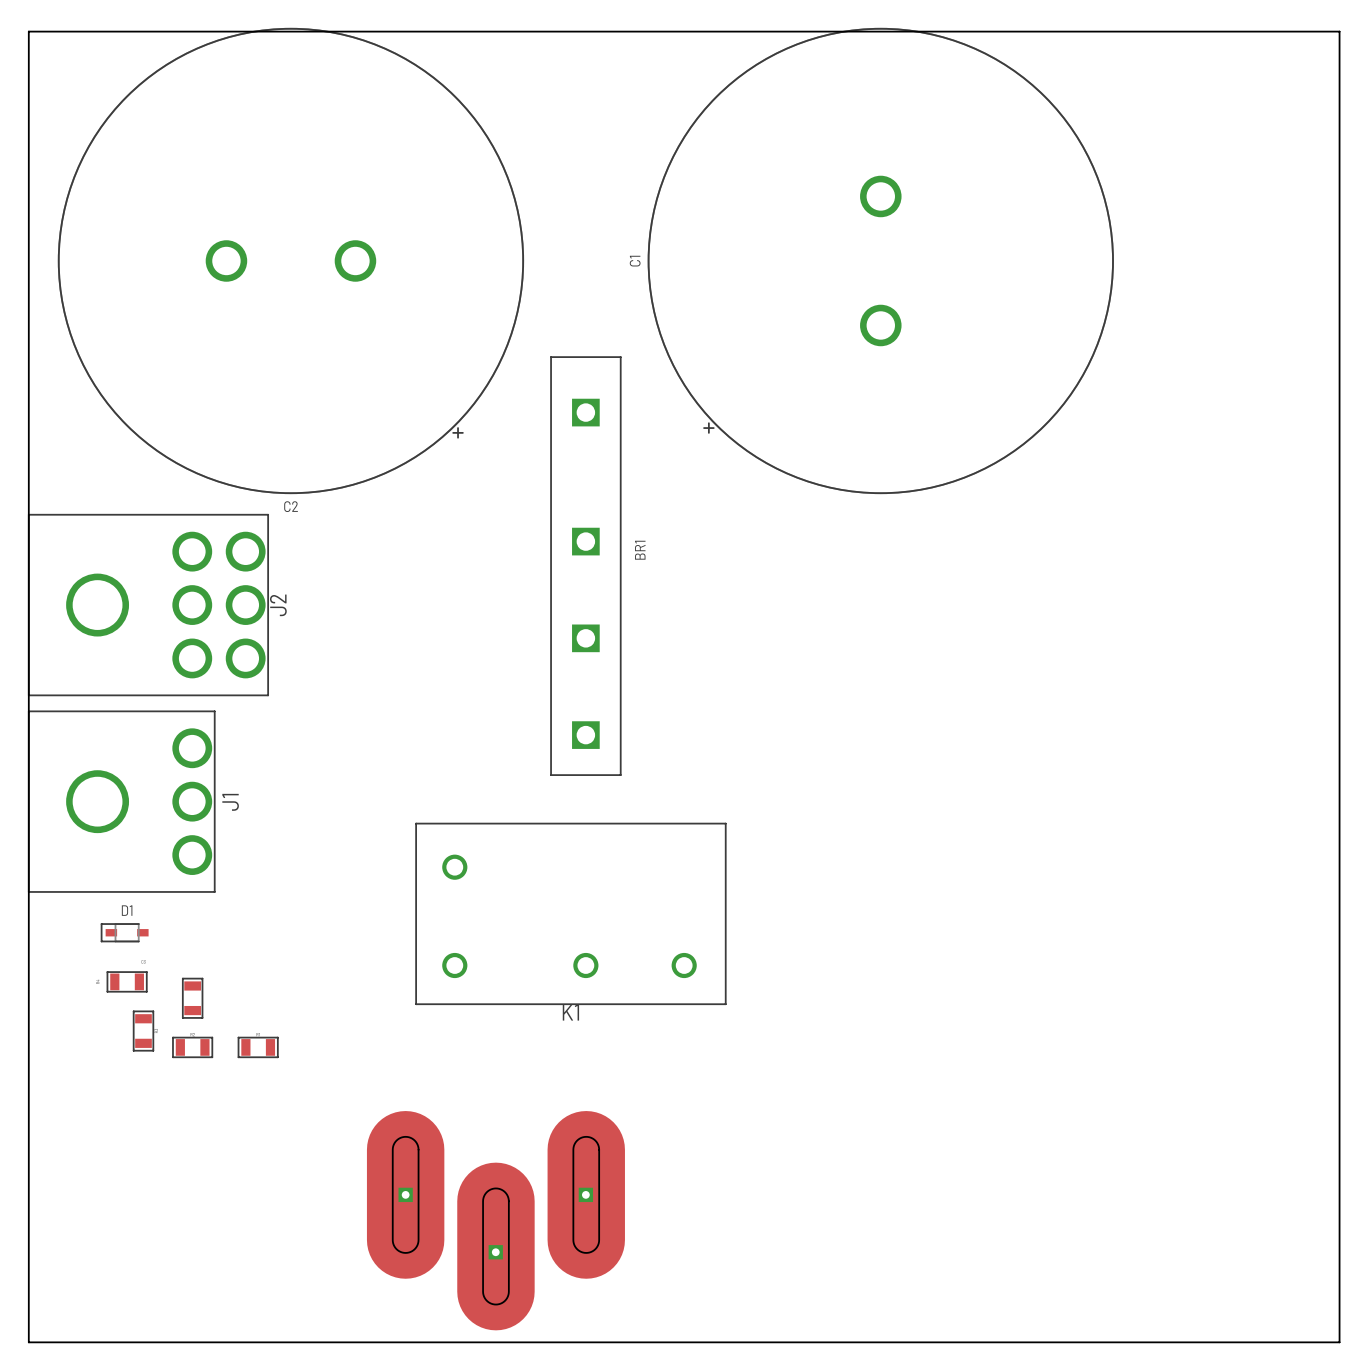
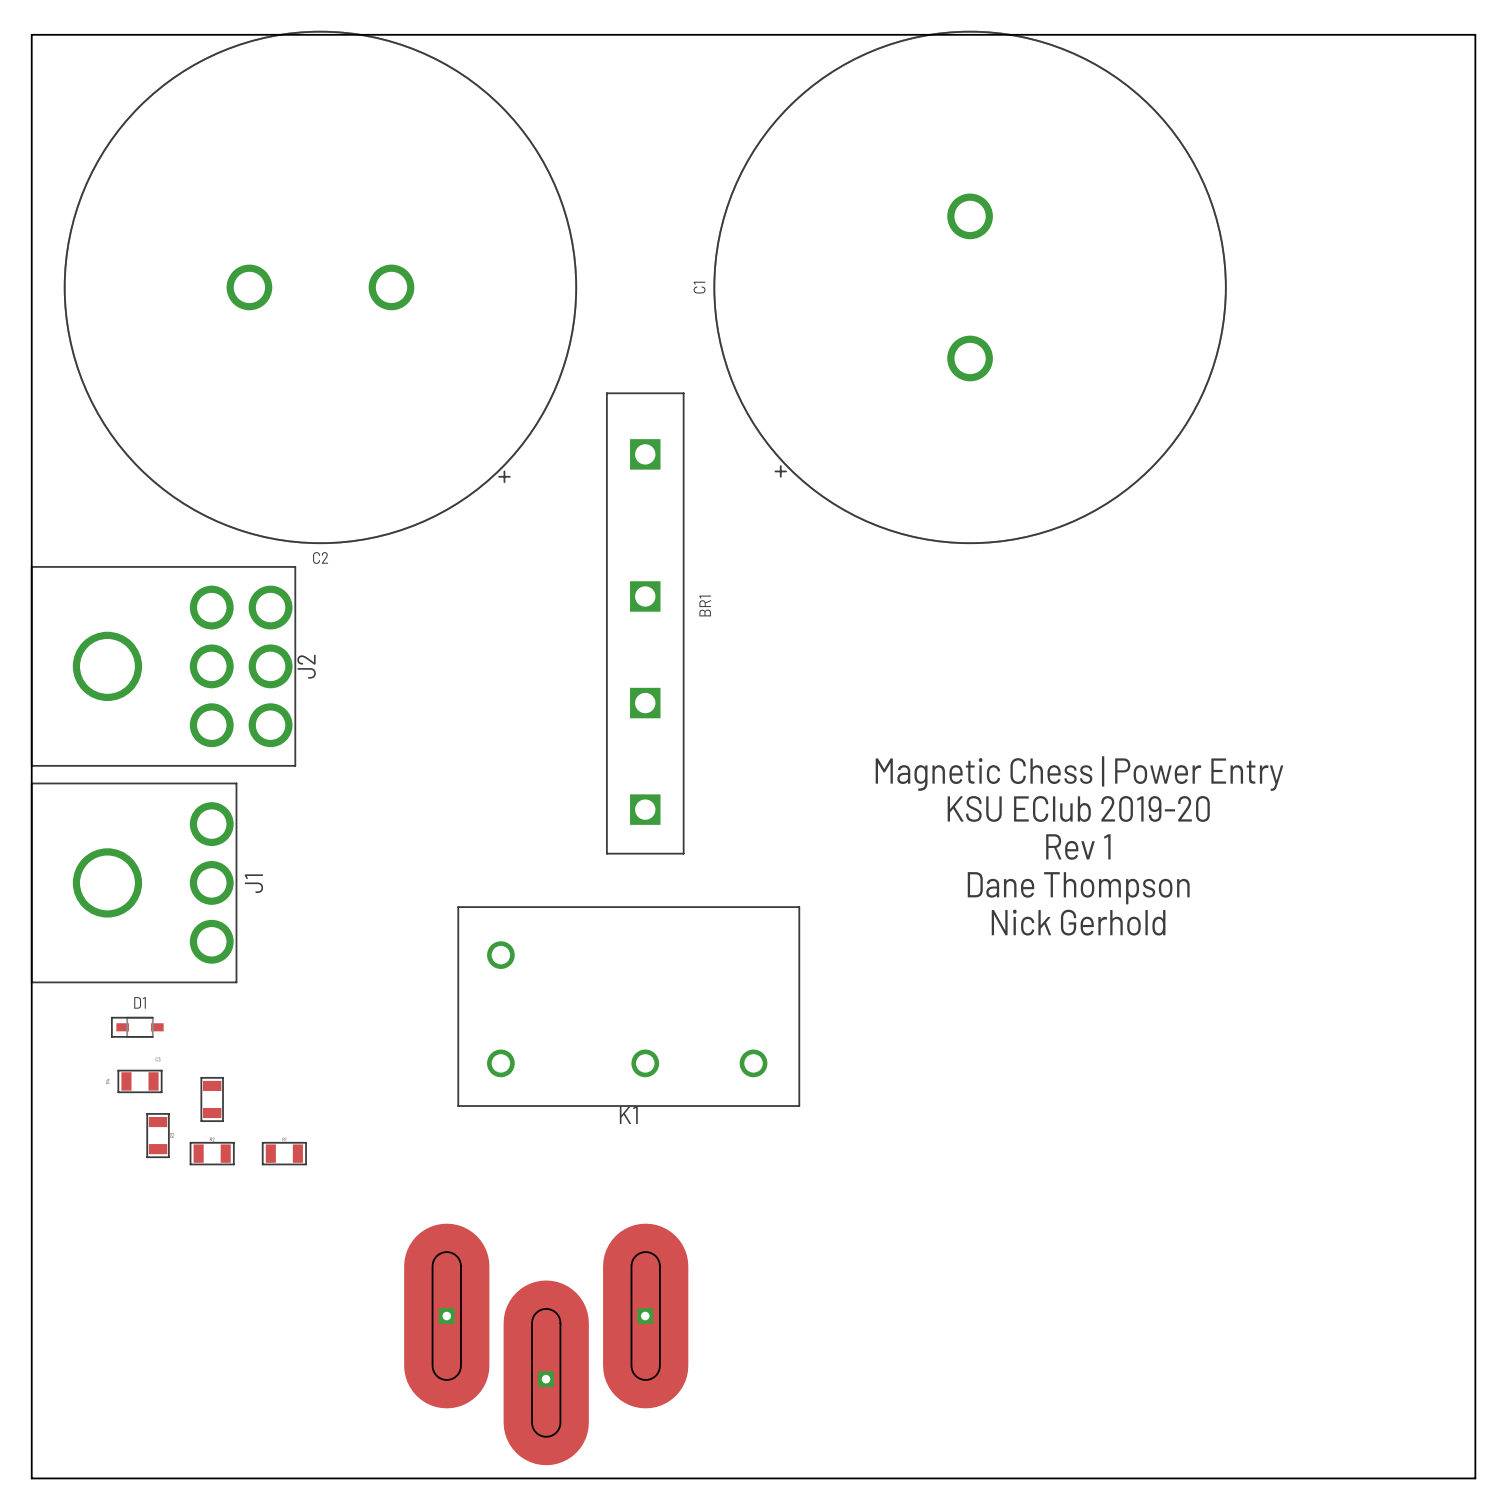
text: none -> Magnetic Chess | Power Entry (1079, 773)
text: none -> KSU EClub 2019-20 (1078, 808)
text: none -> Rev 1 (1078, 847)
text: none -> Dane Thompson (1078, 888)
text: none -> Nick Gerhold (1078, 922)

